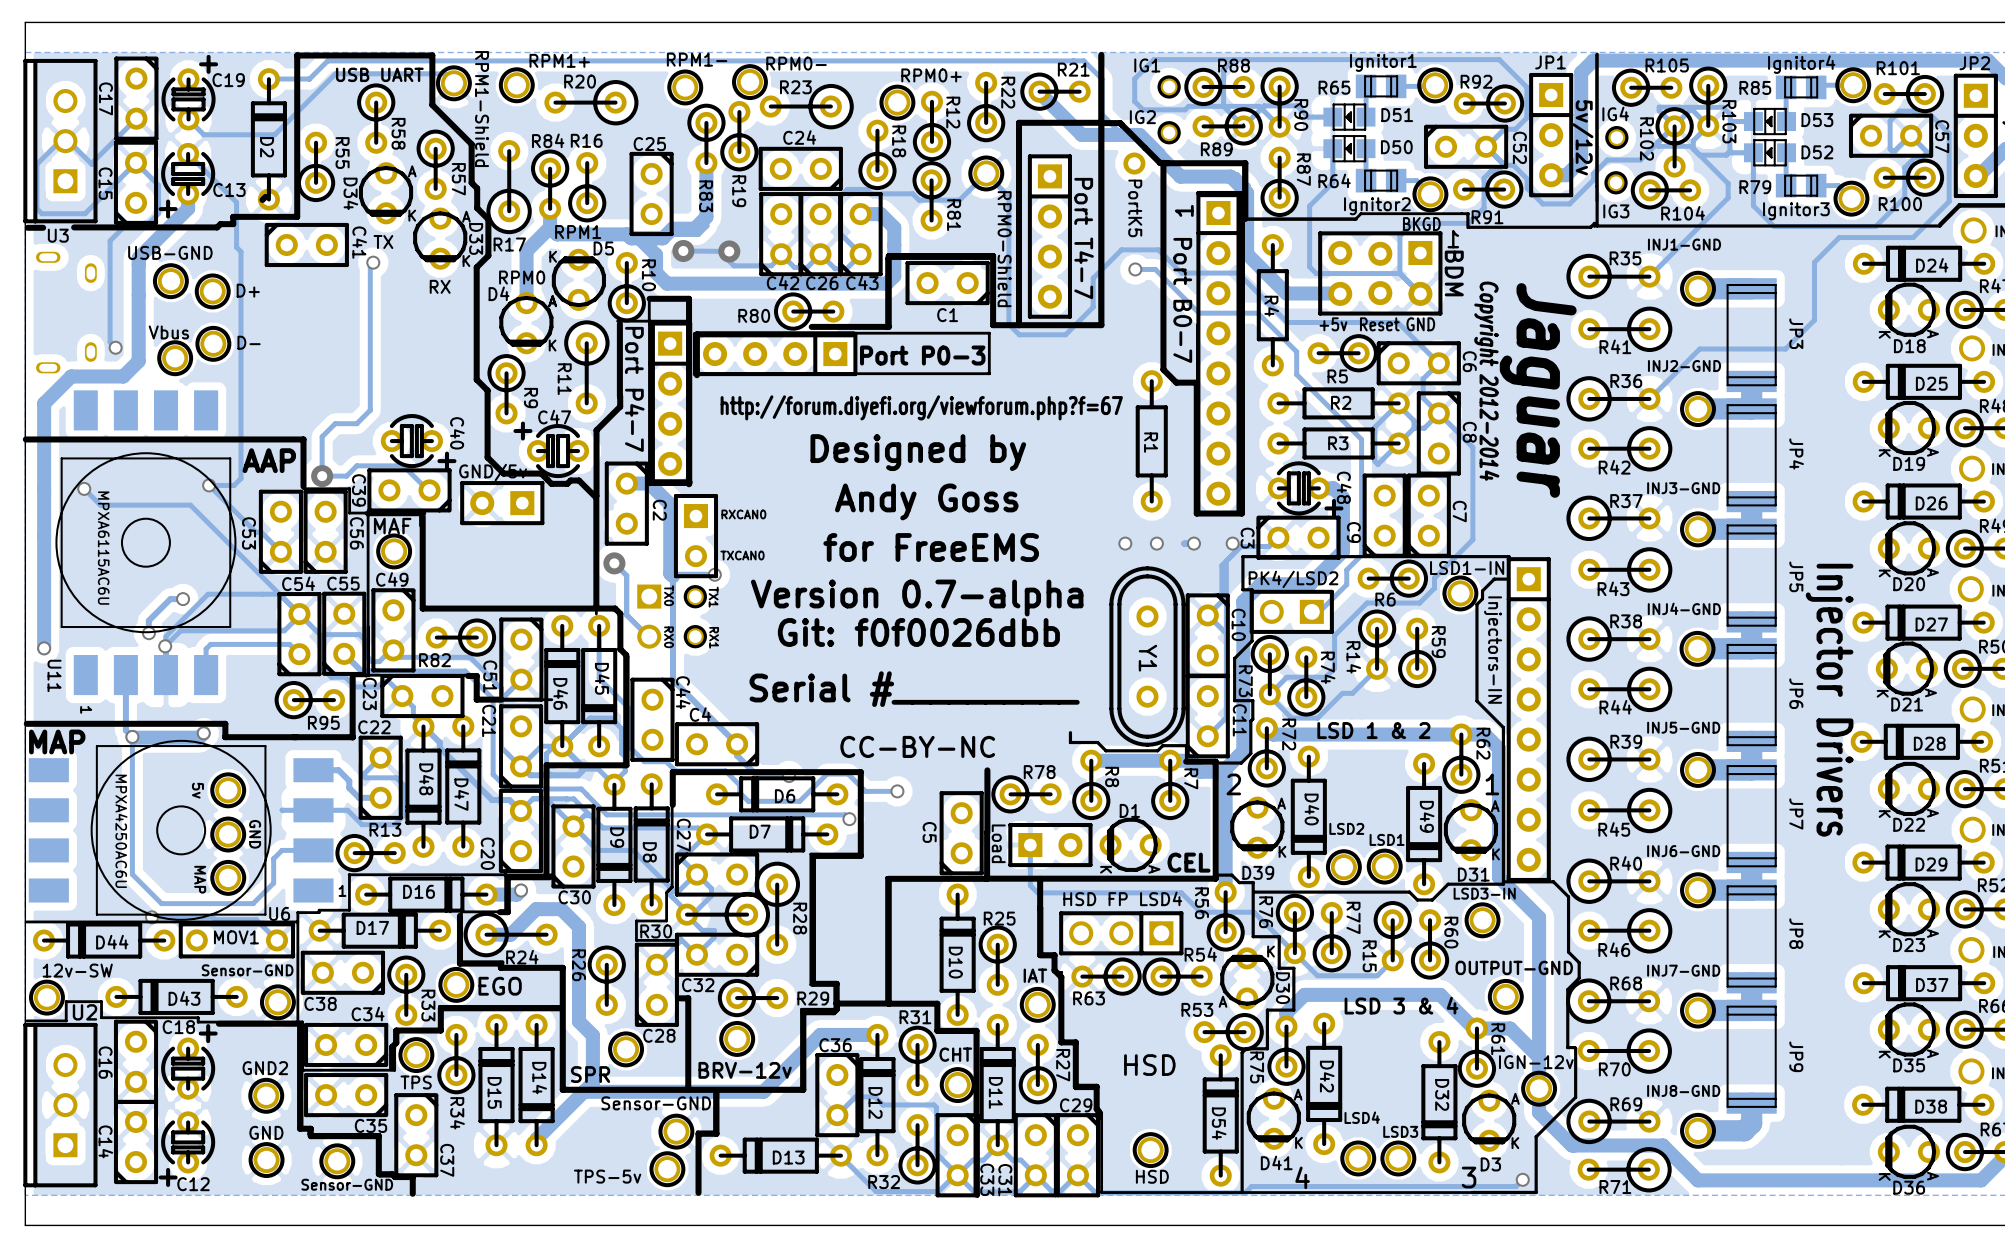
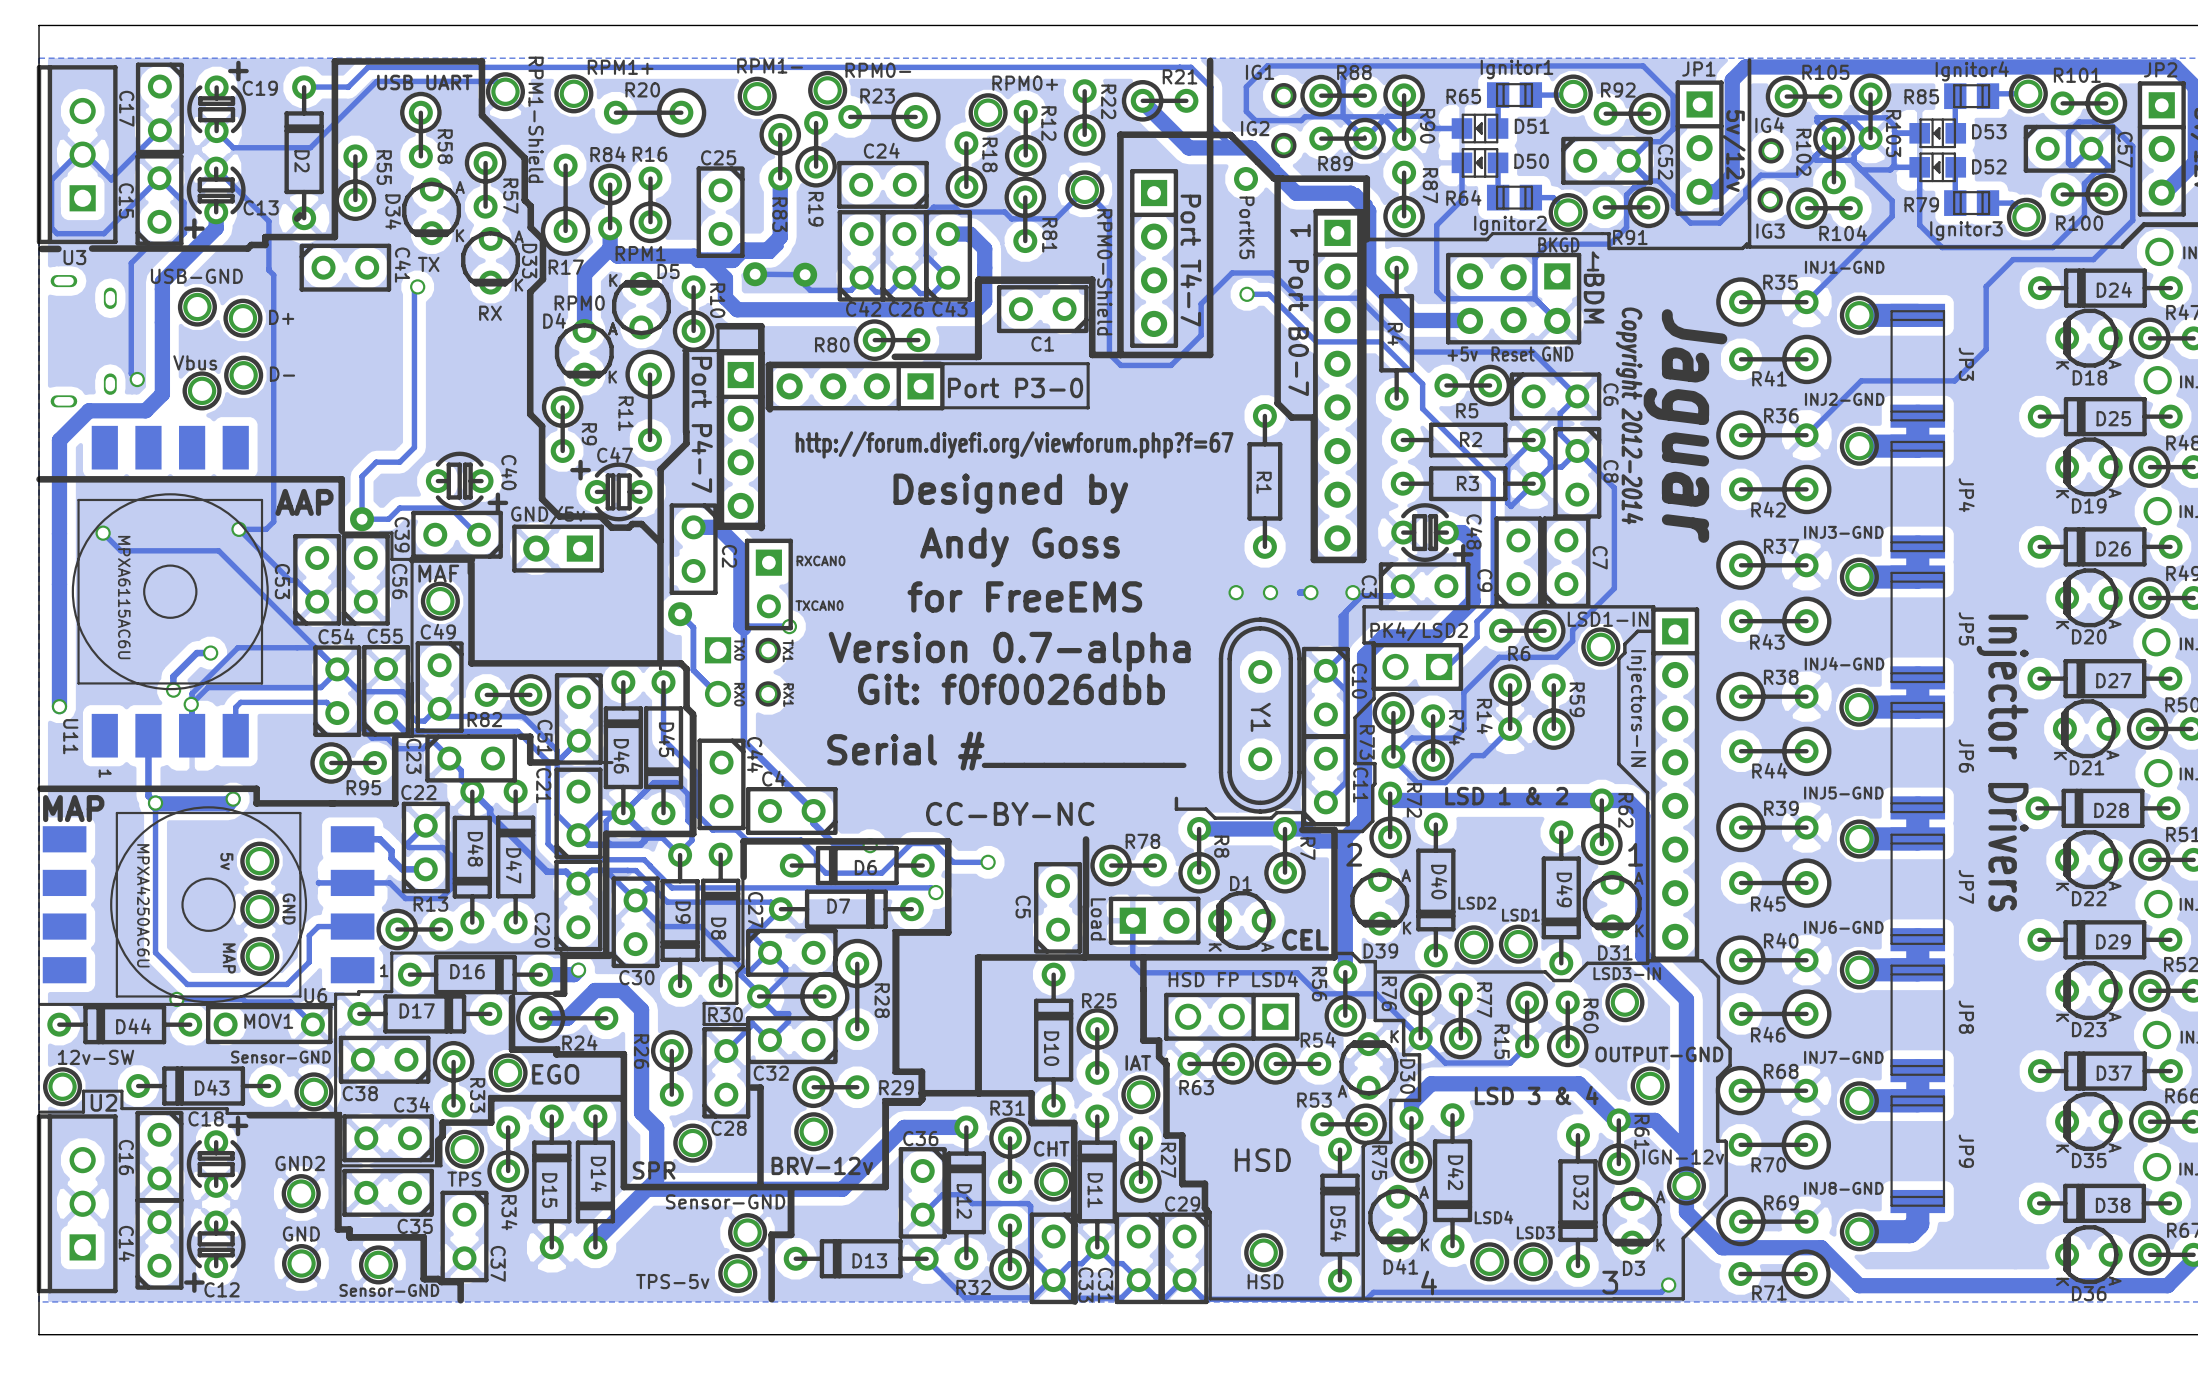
part value: Port P0-3 (922, 355) -> none
text: none -> Port P3-0 (1015, 387)

